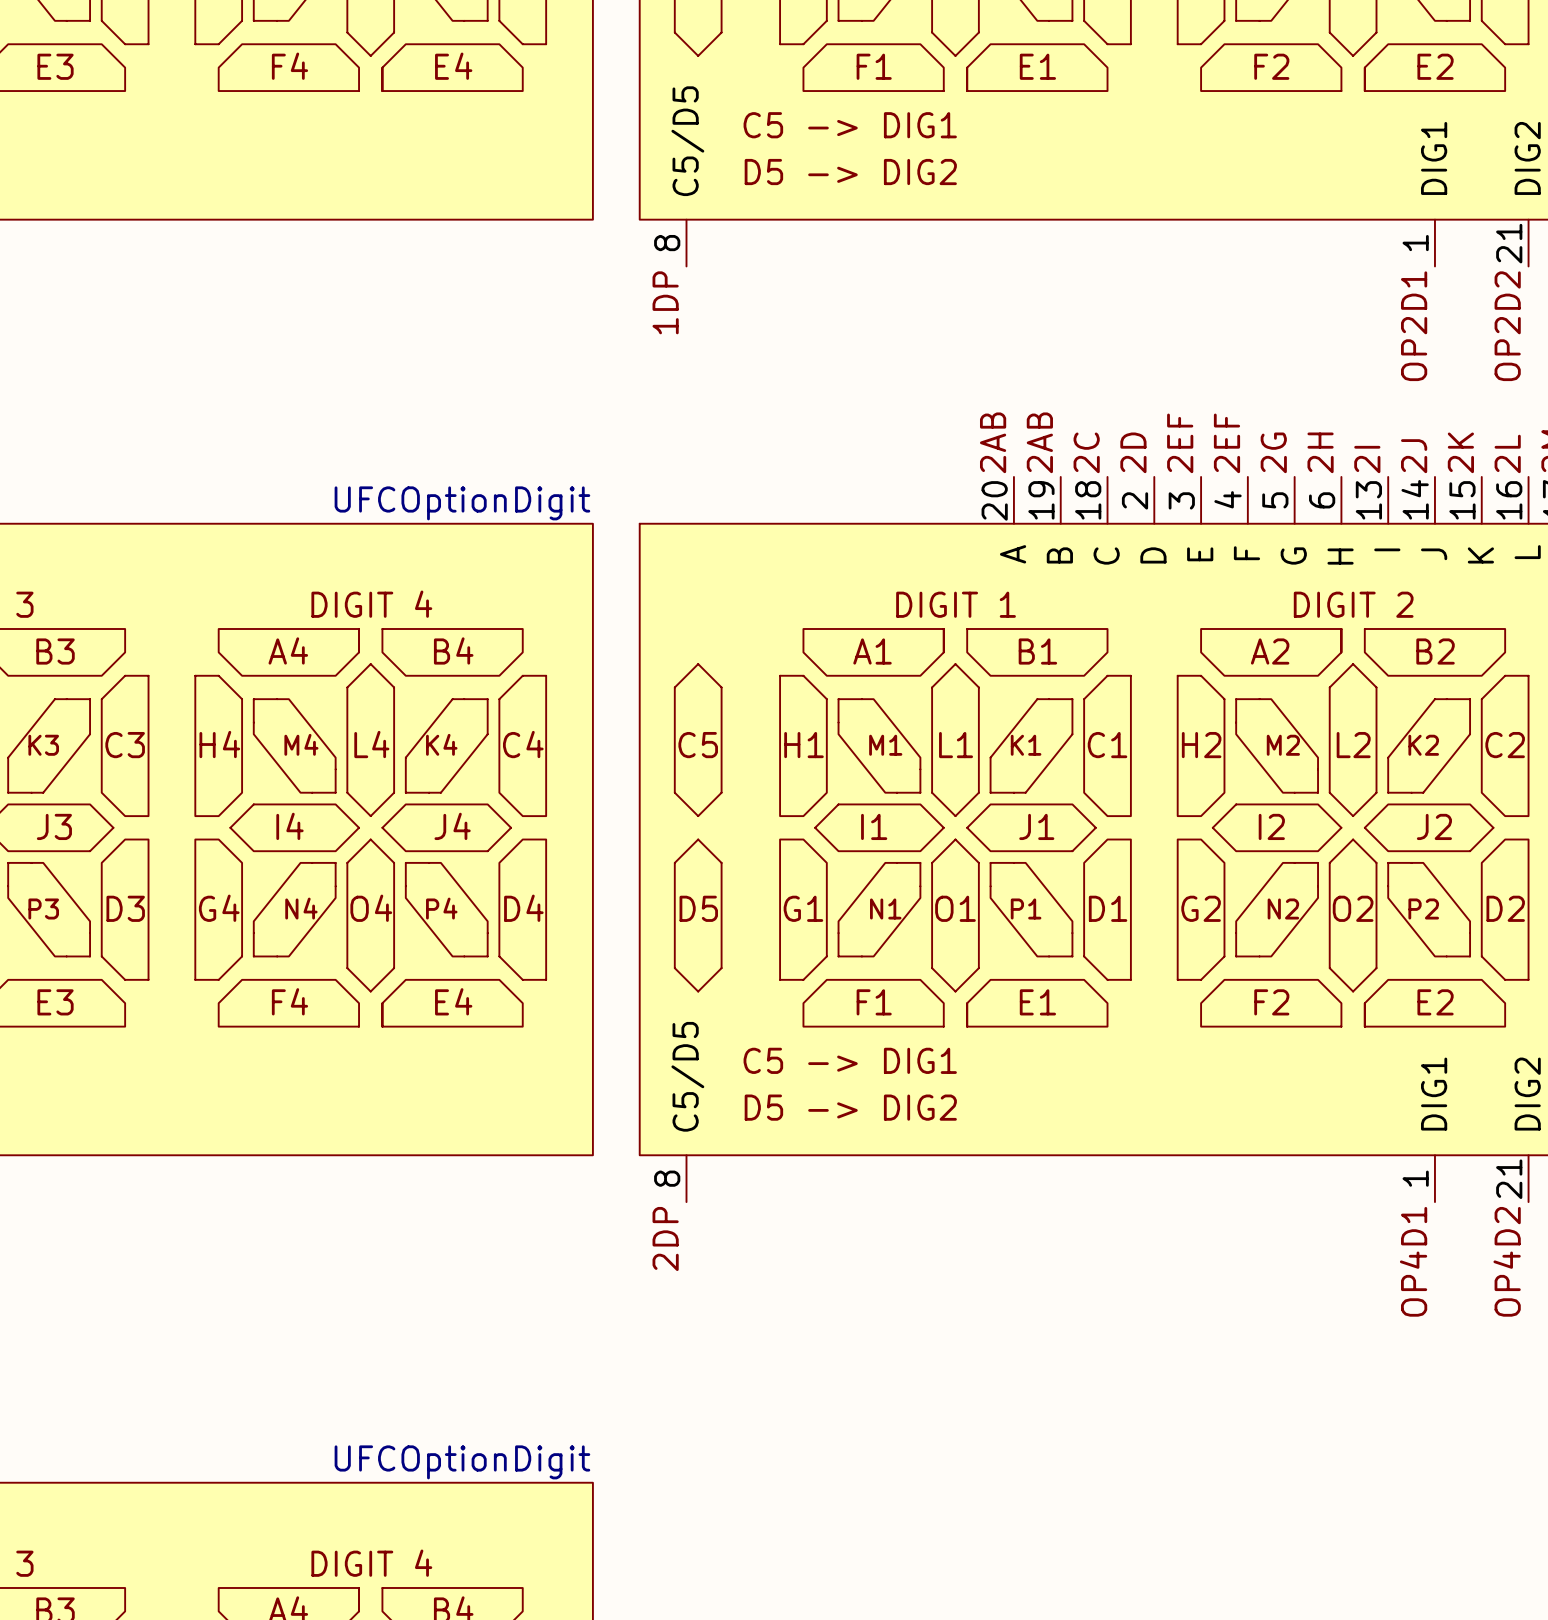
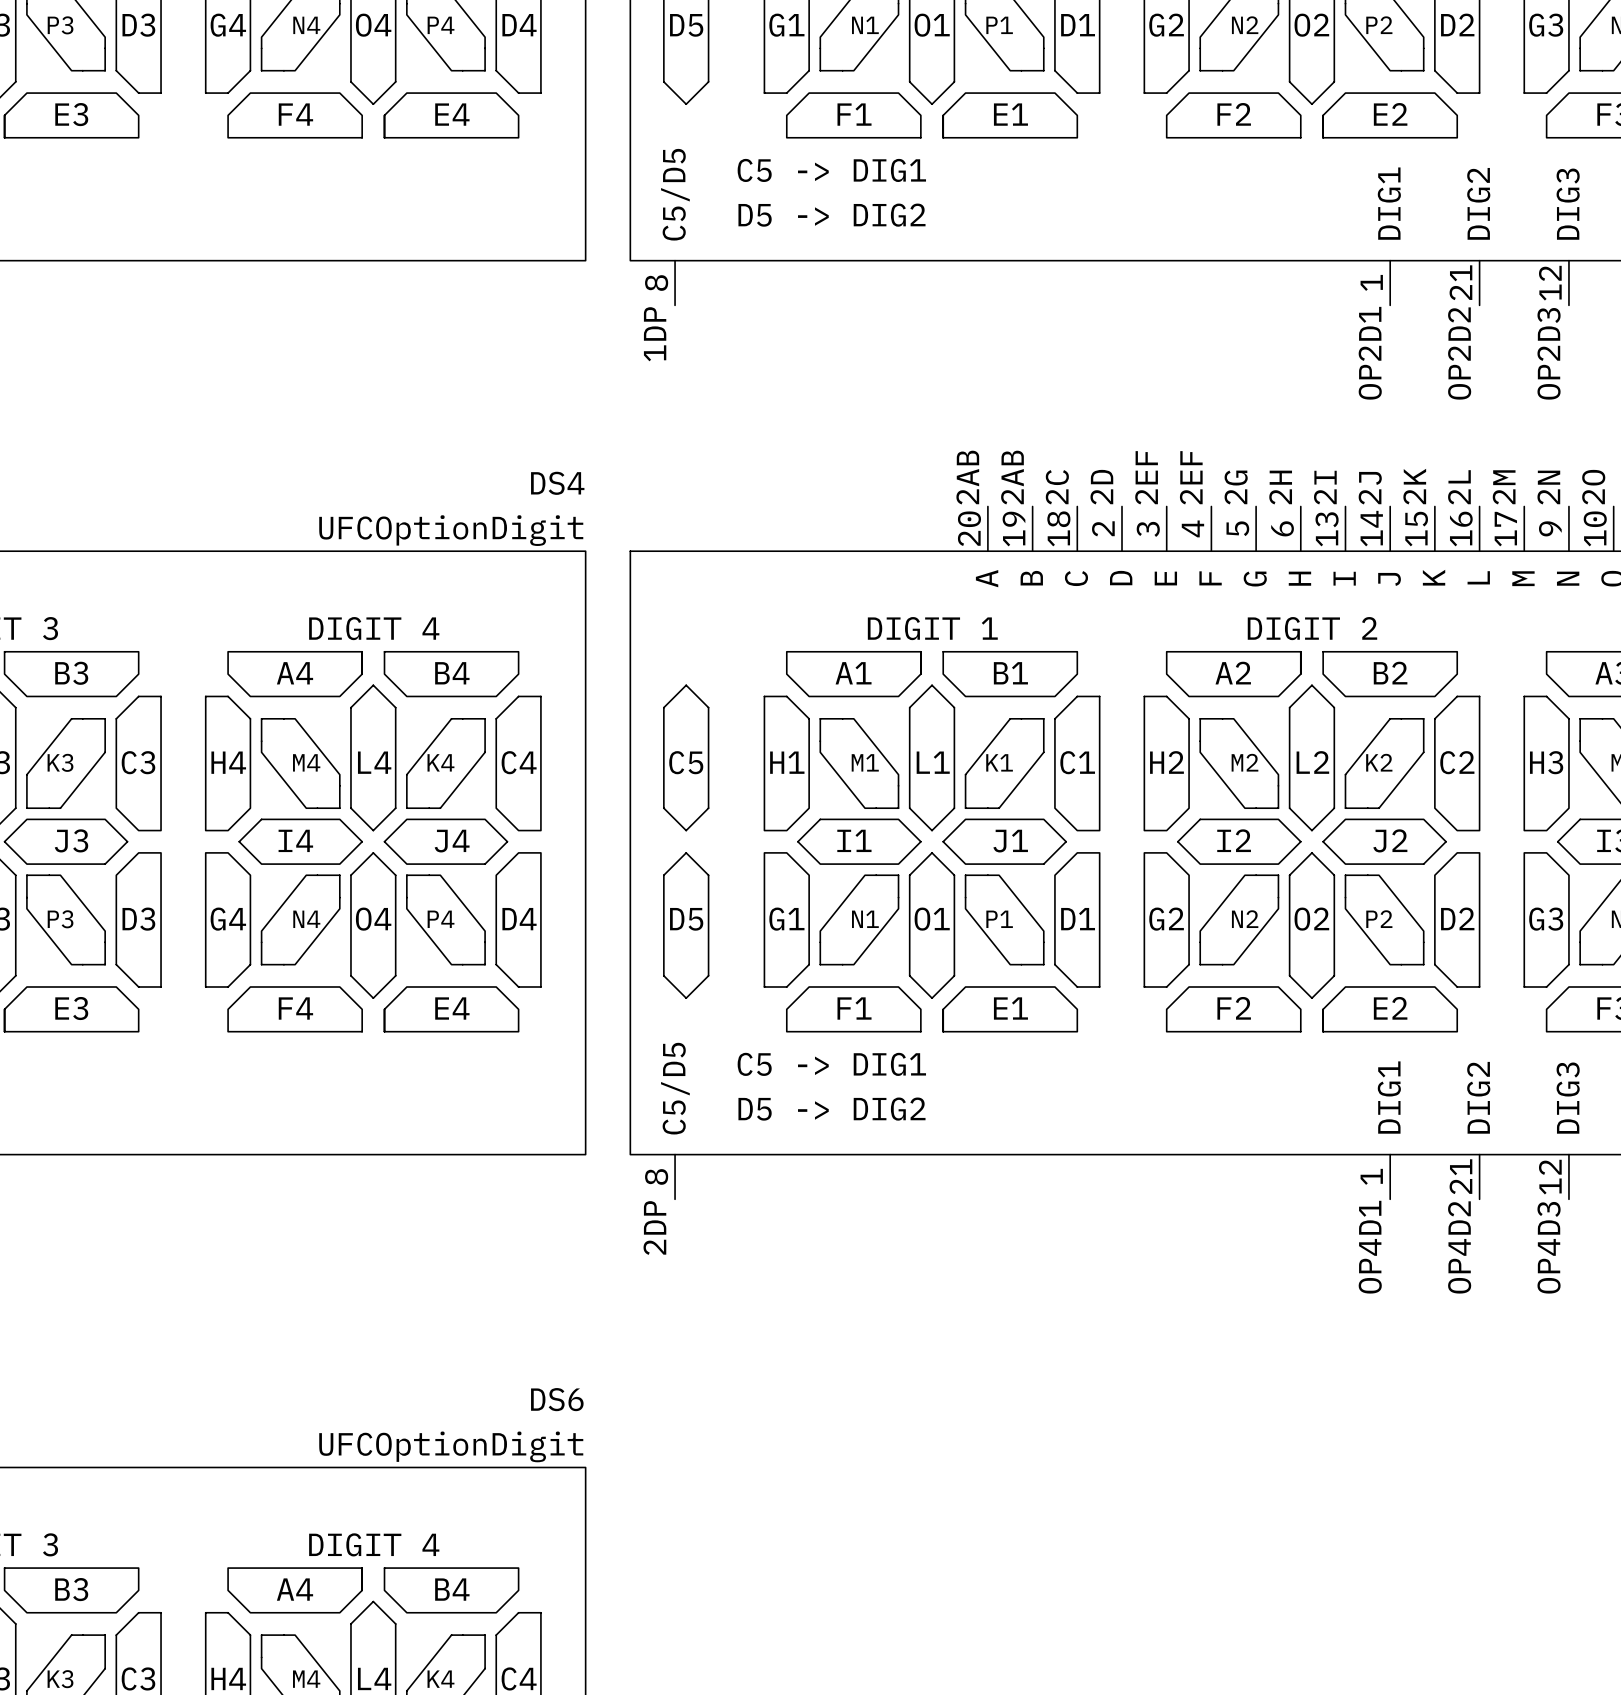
DS4 name: none -> DS4 (557, 483)
DS6 name: none -> DS6 (557, 1399)

